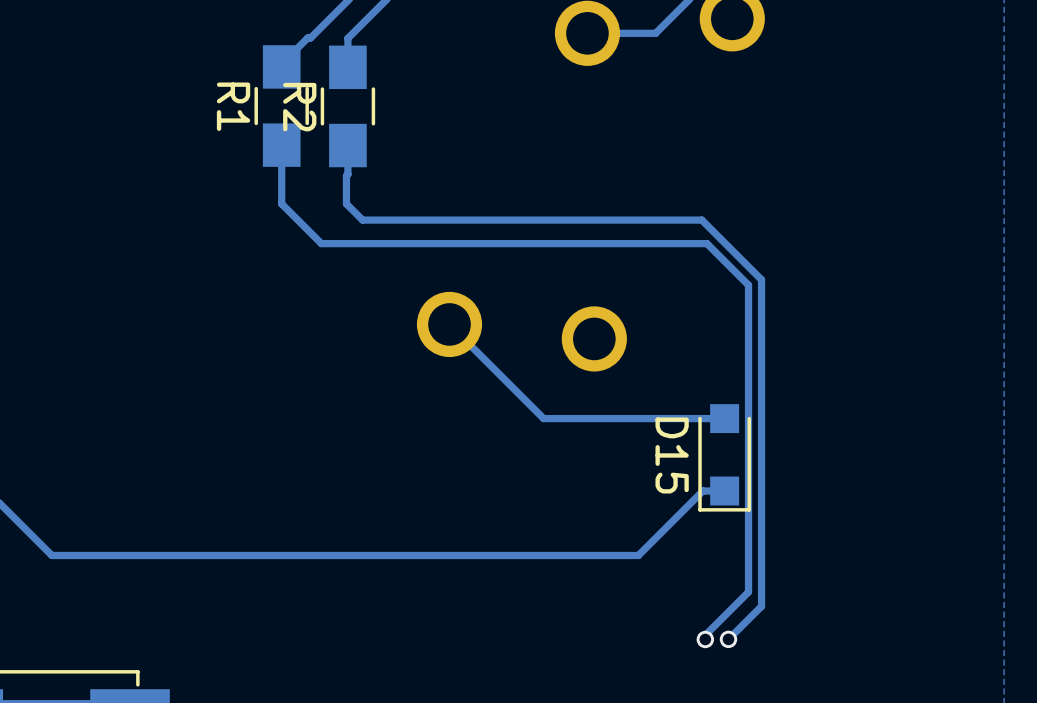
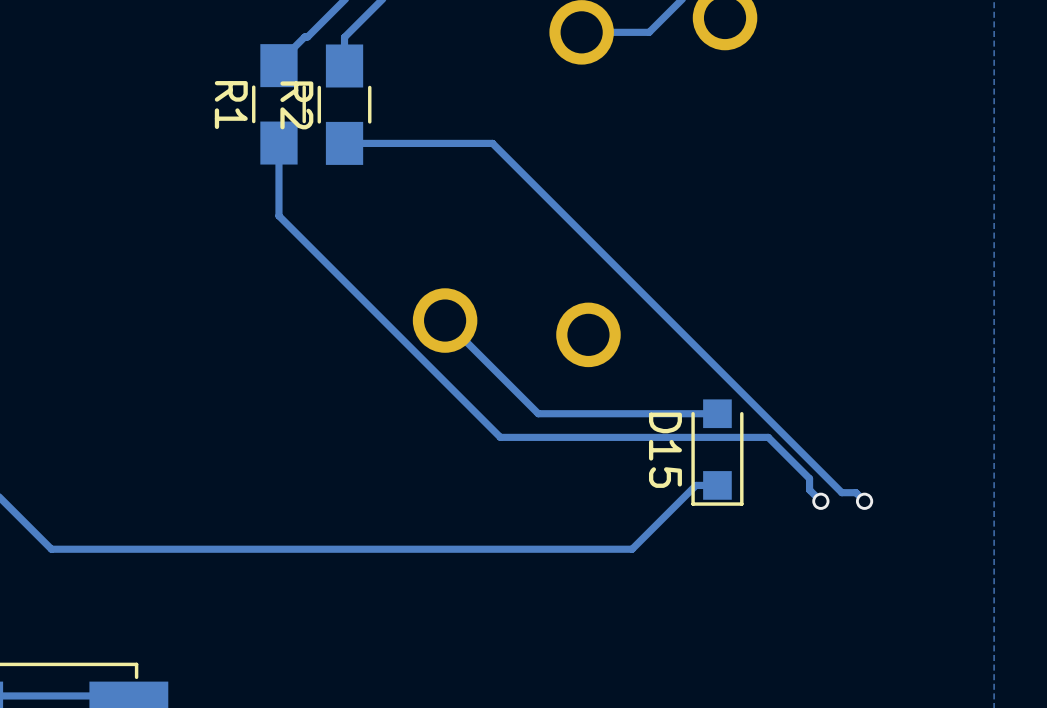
track: (347, 145) (346, 203) (362, 220) (701, 220) (761, 279) (761, 606) (728, 639) -> (344, 143) (492, 143) (841, 492) (855, 492) (864, 501)
track: (281, 203) (321, 243) (706, 243) (748, 285) (748, 592) (705, 635) (705, 639) -> (278, 201) (278, 215) (500, 437) (768, 437) (809, 478) (809, 489) (820, 501)
via: none -> (820, 501)
via: none -> (864, 501)
via: (705, 639) -> none
via: (728, 639) -> none

